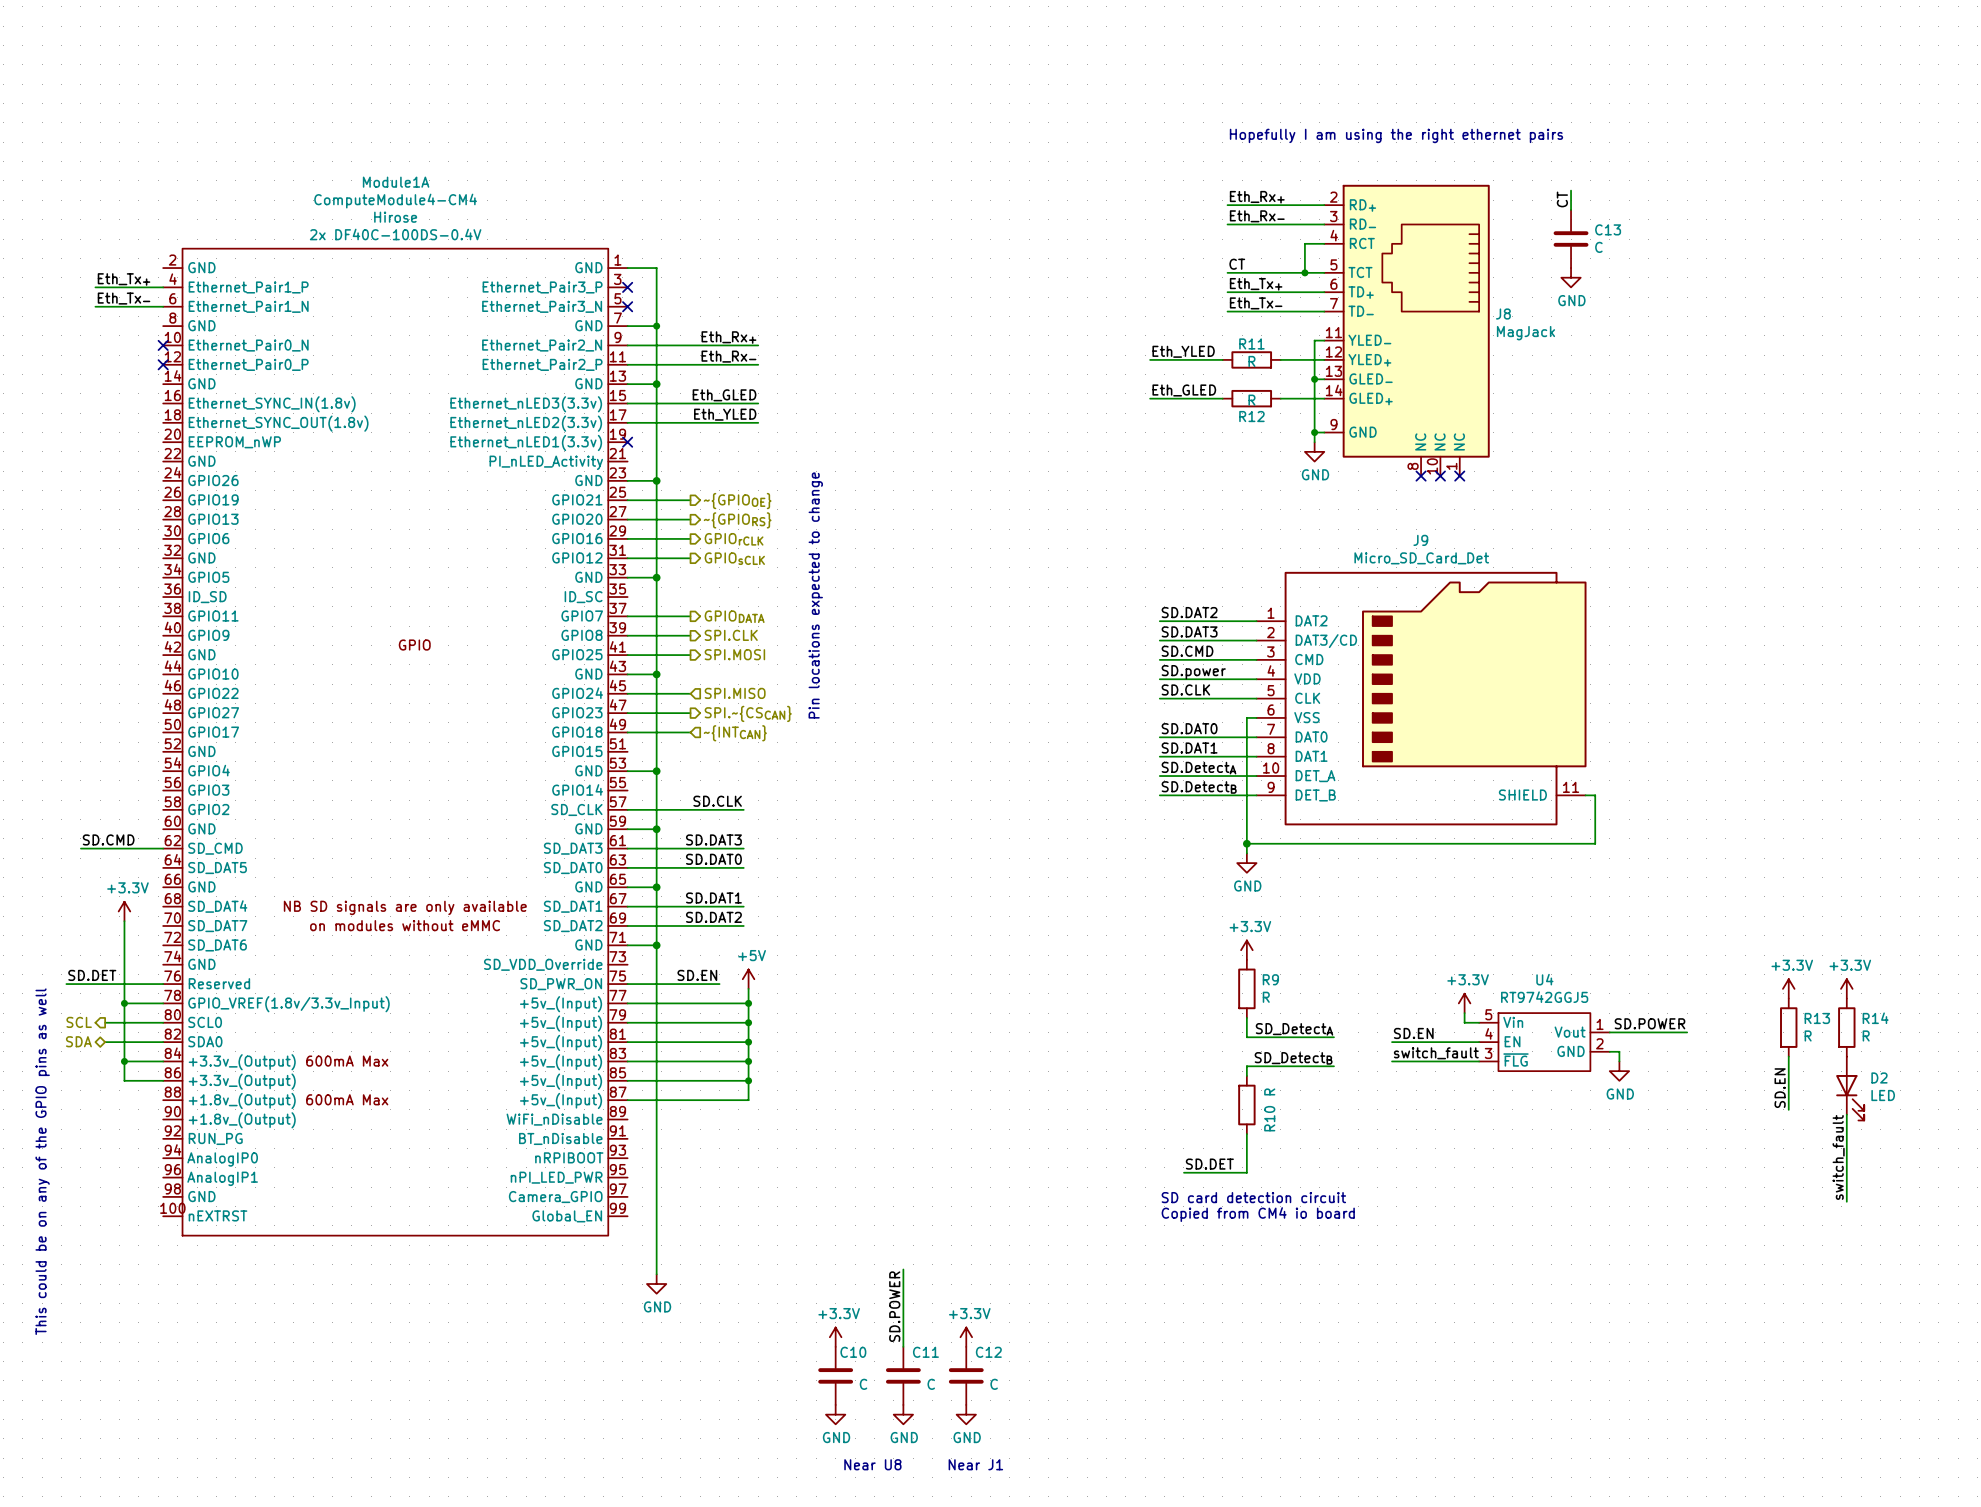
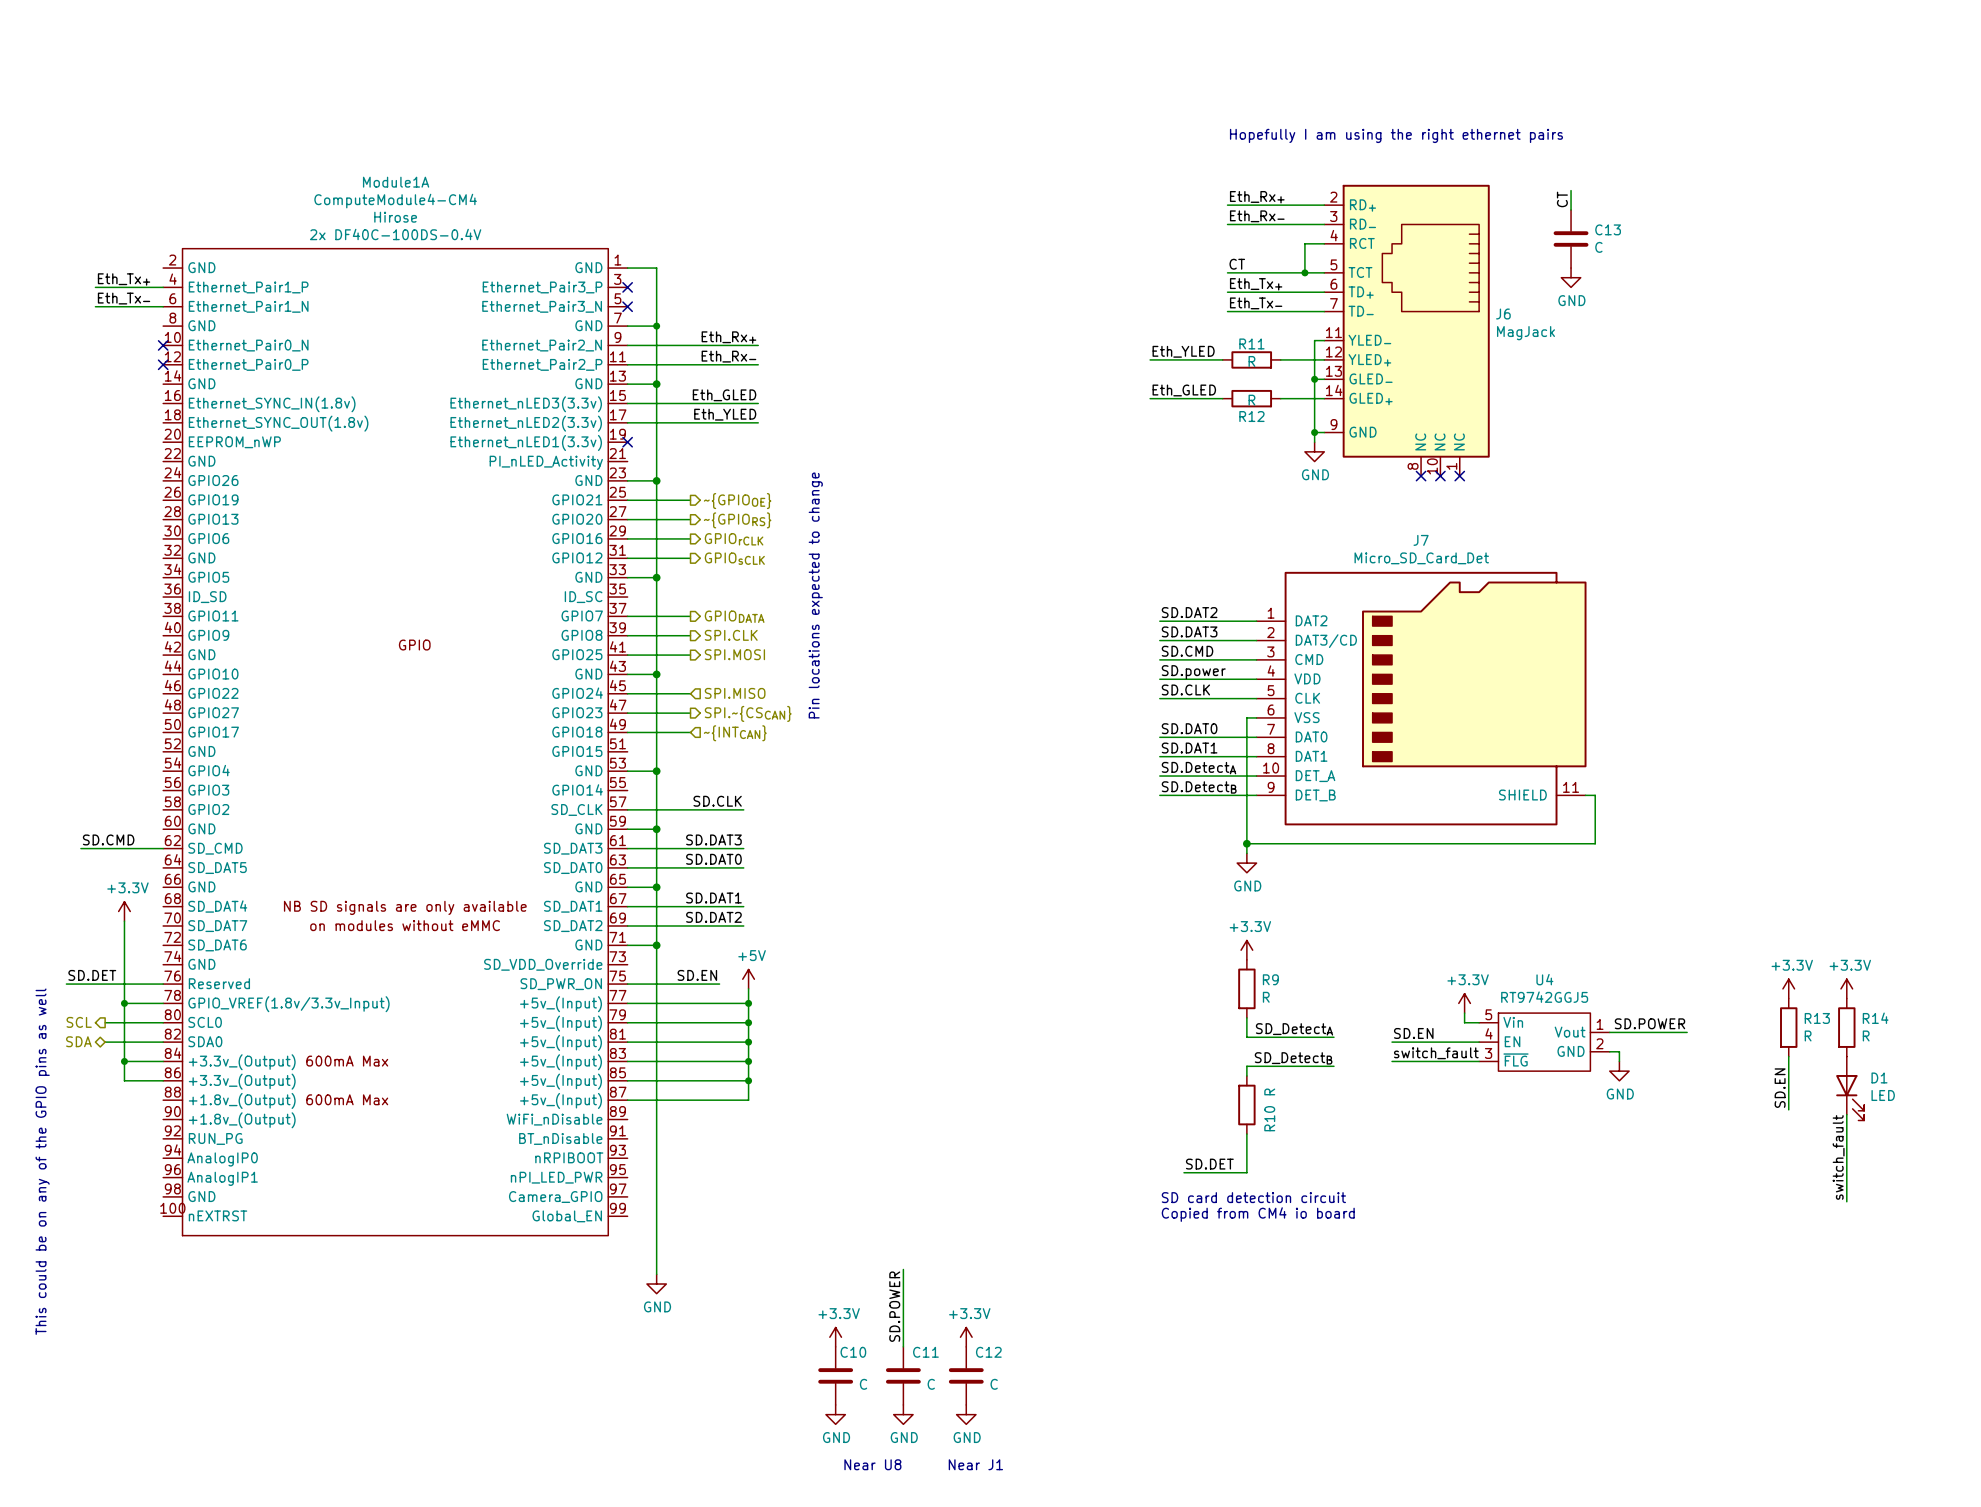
J8 name: J8 (1503, 314) -> J6 (1503, 314)
J9 name: J9 (1420, 540) -> J7 (1421, 540)
D2 name: D2 (1879, 1077) -> D1 (1879, 1077)

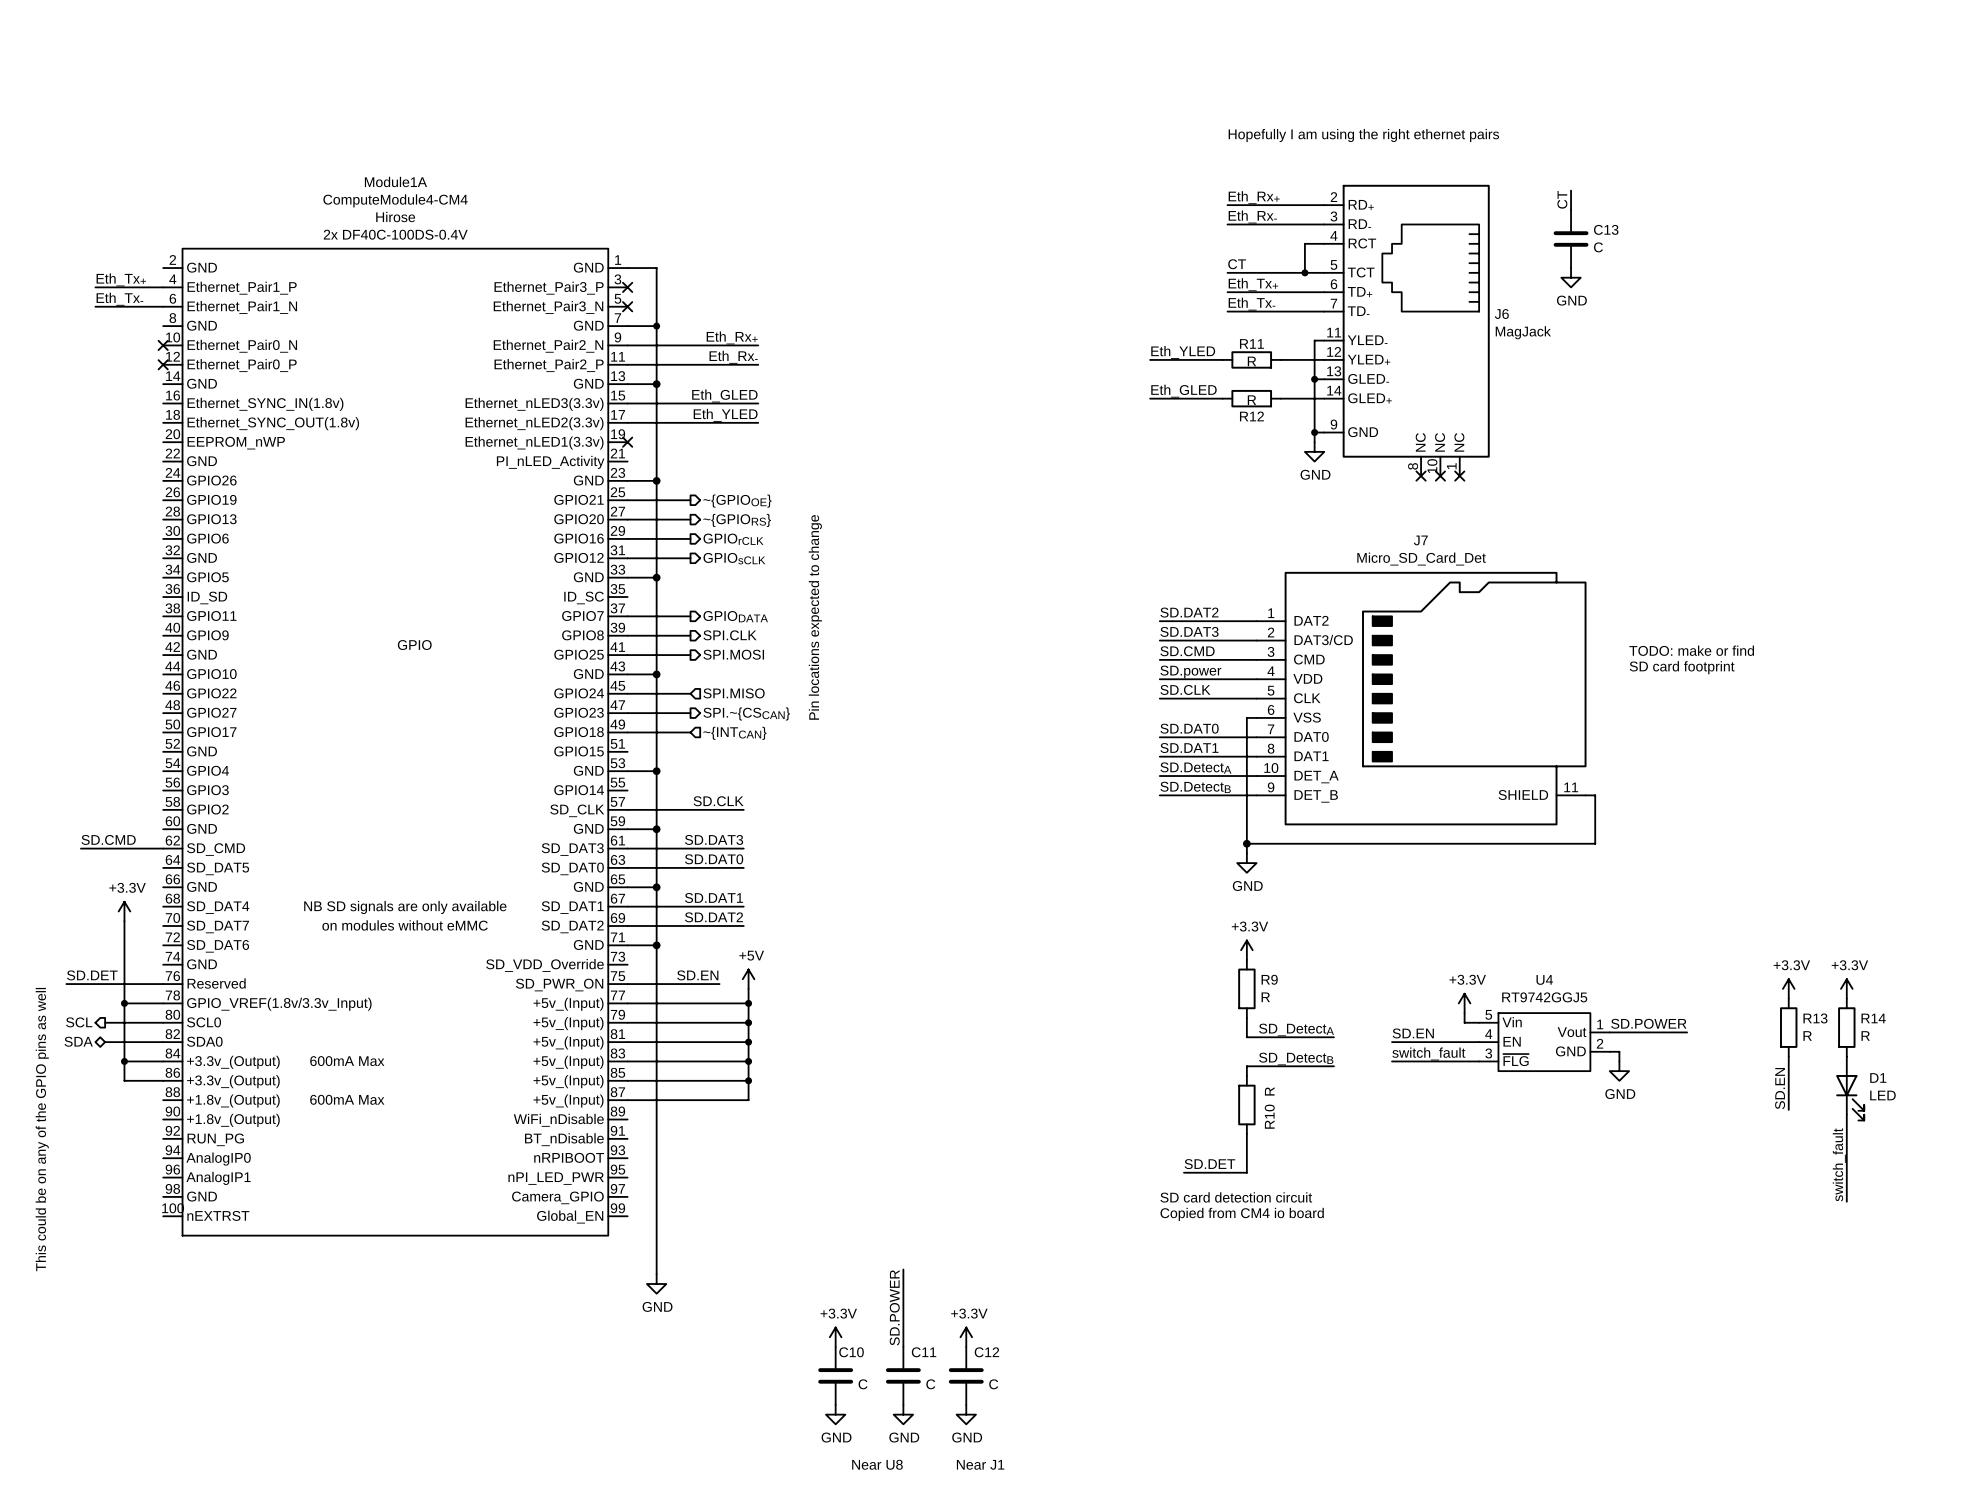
text: none -> TODO: make or find (1691, 650)
text: none -> SD card footprint (1682, 667)

